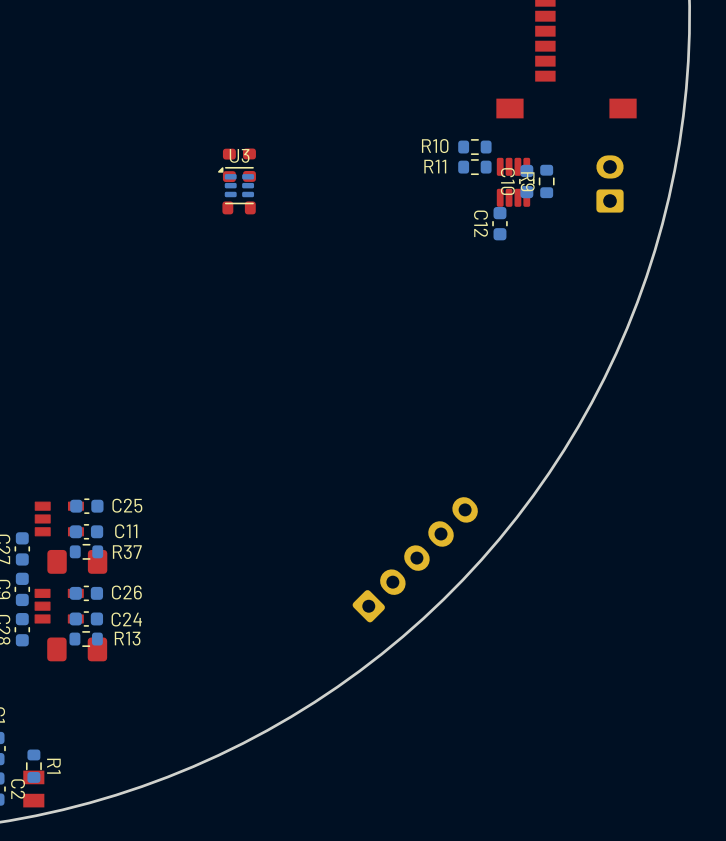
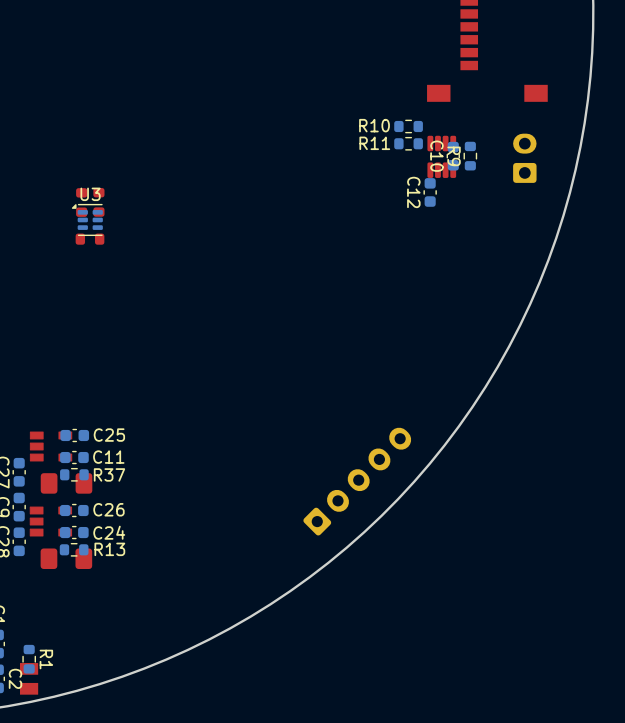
part: (229, 165) -> none
part: (249, 165) -> none
U3 position: (236, 185) -> (87, 219)
part: (239, 207) -> none
part: none -> (81, 202)
part: none -> (98, 202)
part: none -> (90, 239)

